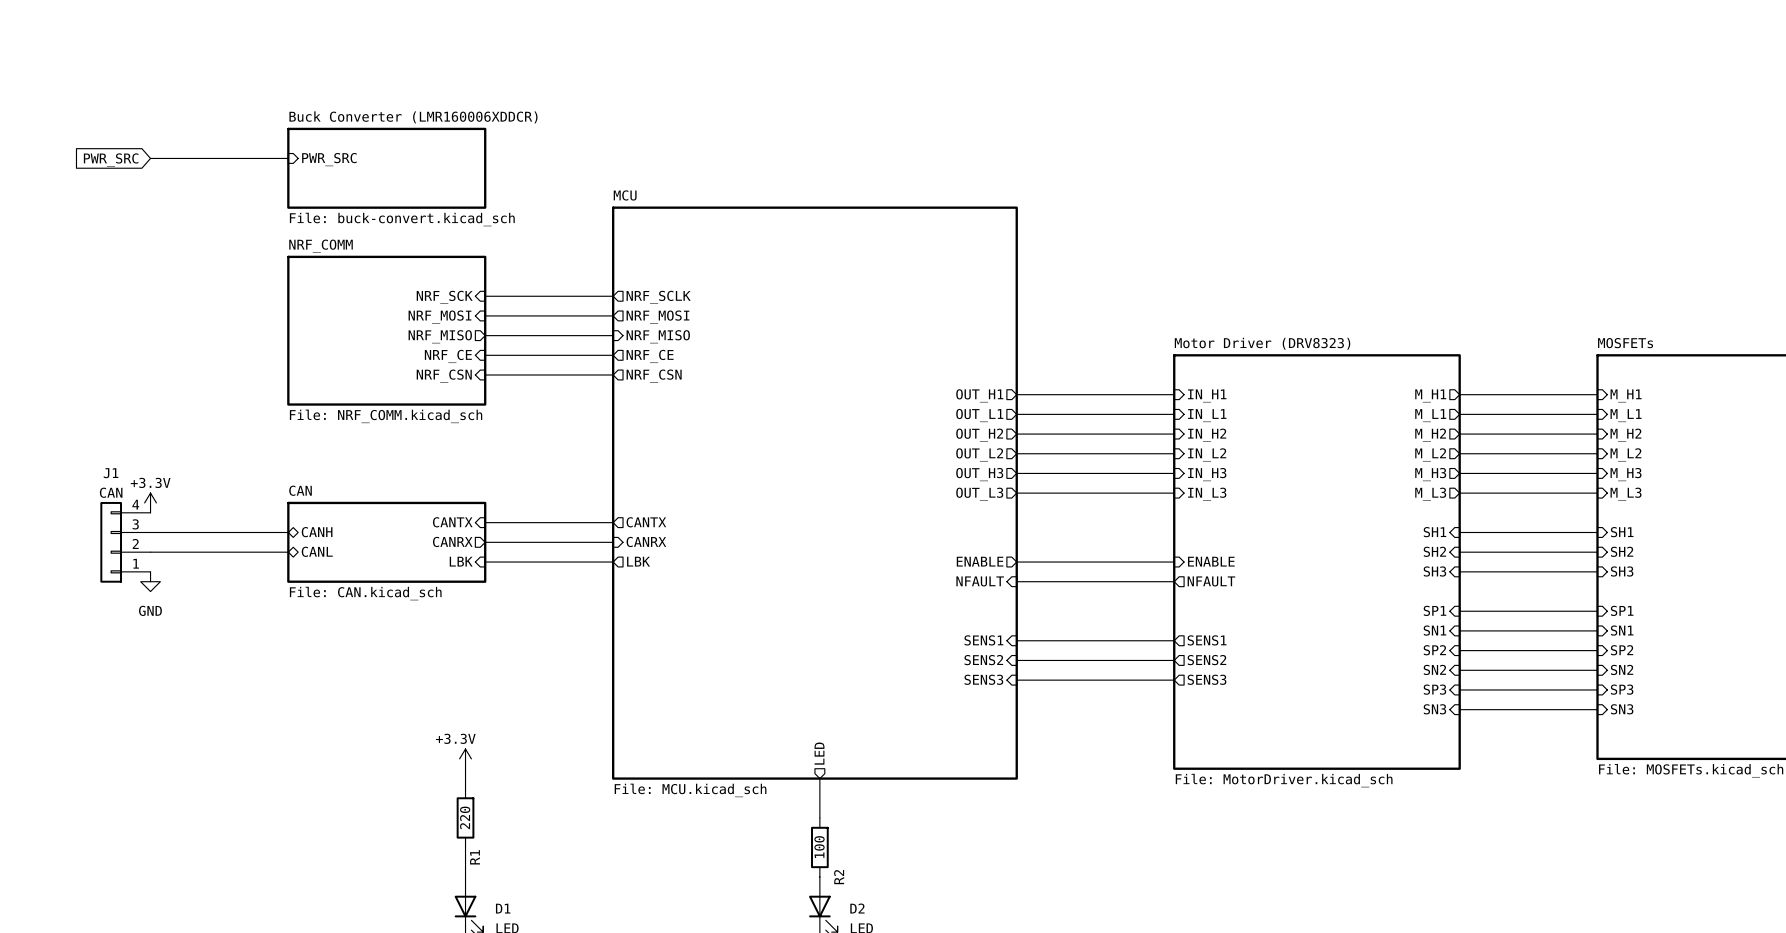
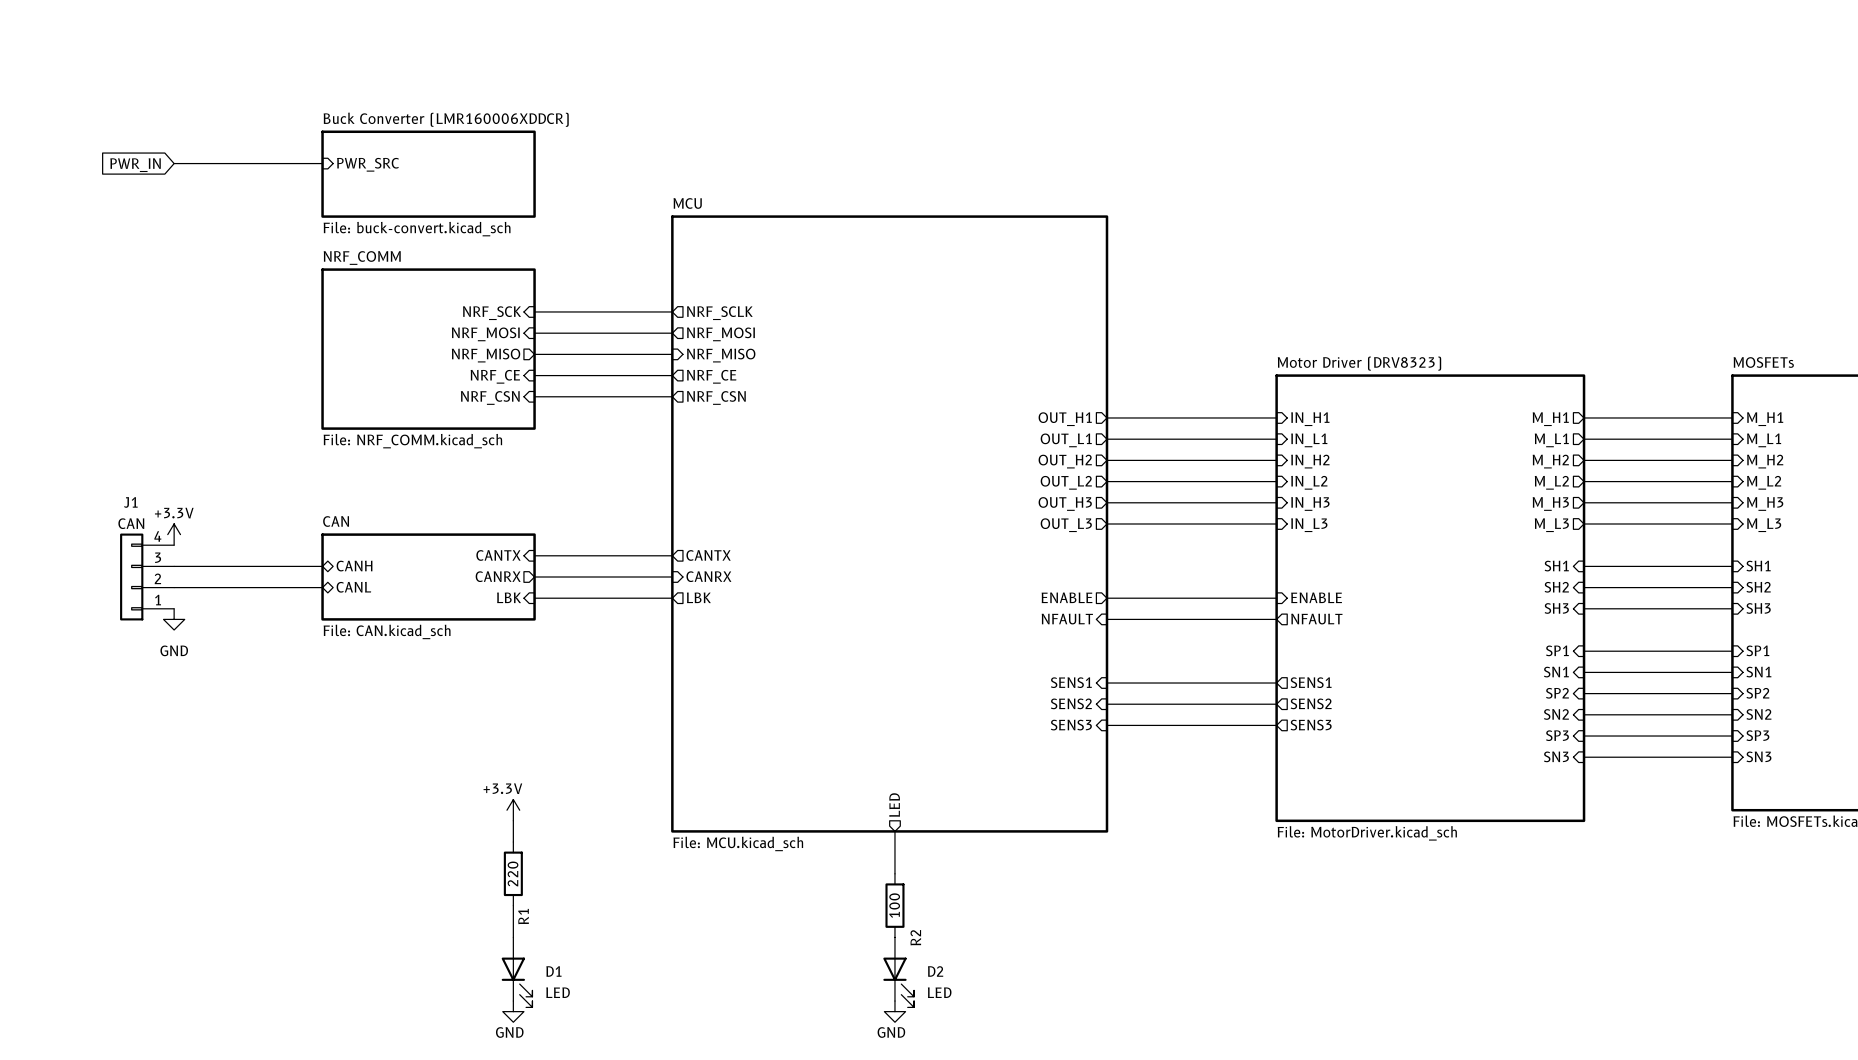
global label: PWR_SRC (111, 159) -> PWR_IN (135, 165)

